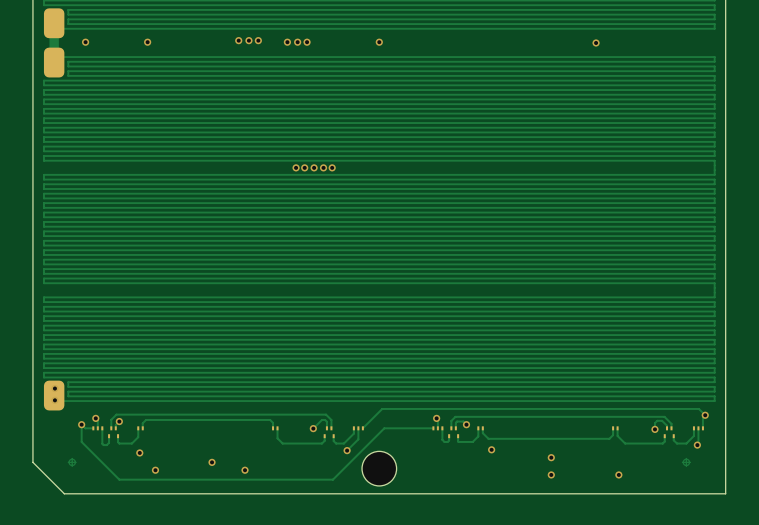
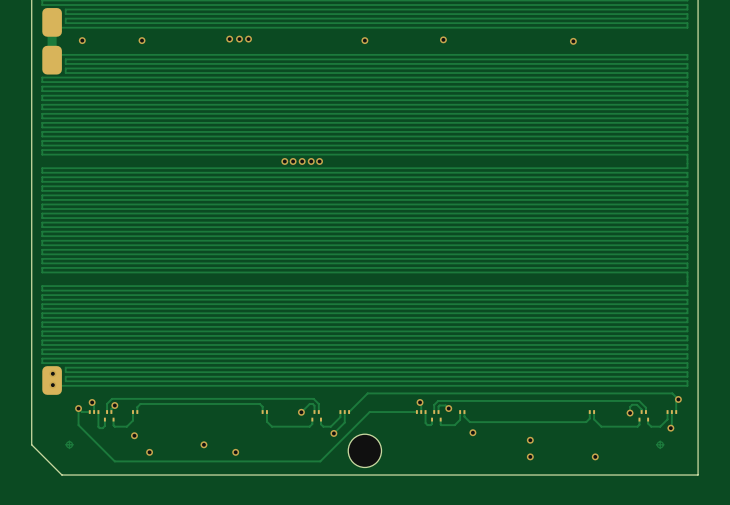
via: none -> (443, 39)
via: (287, 42) -> none
via: (297, 42) -> none
via: (307, 42) -> none

